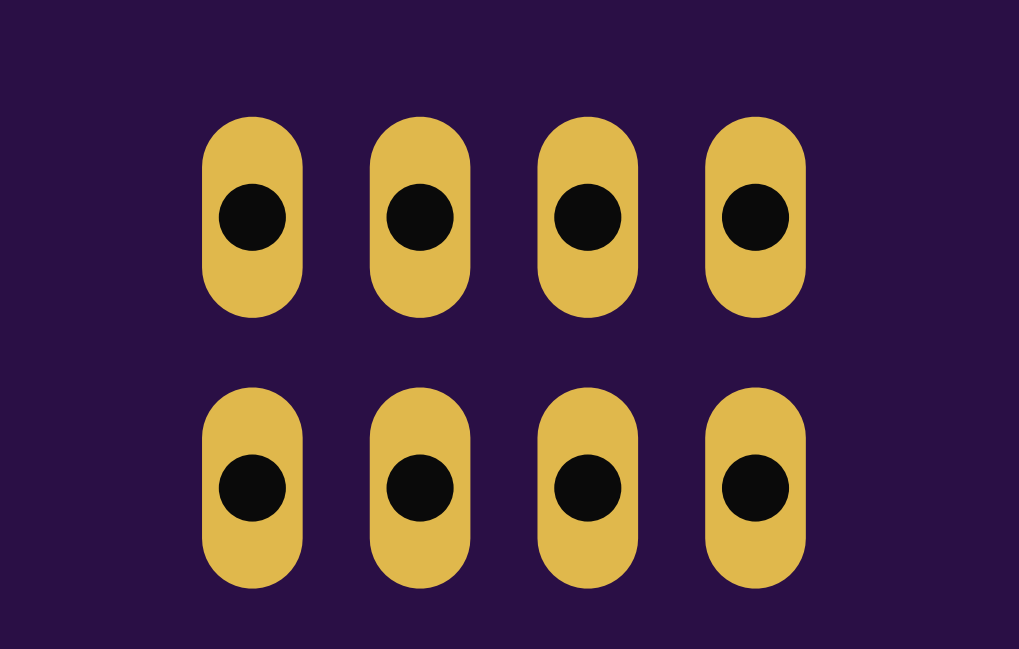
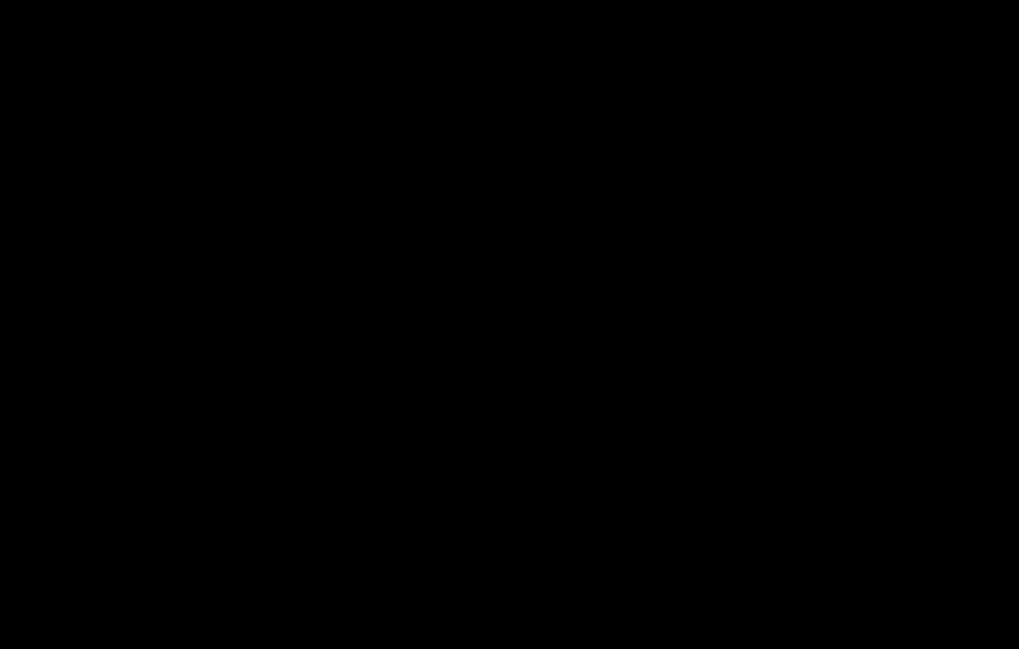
part: (503, 217) -> none
part: (503, 488) -> none

